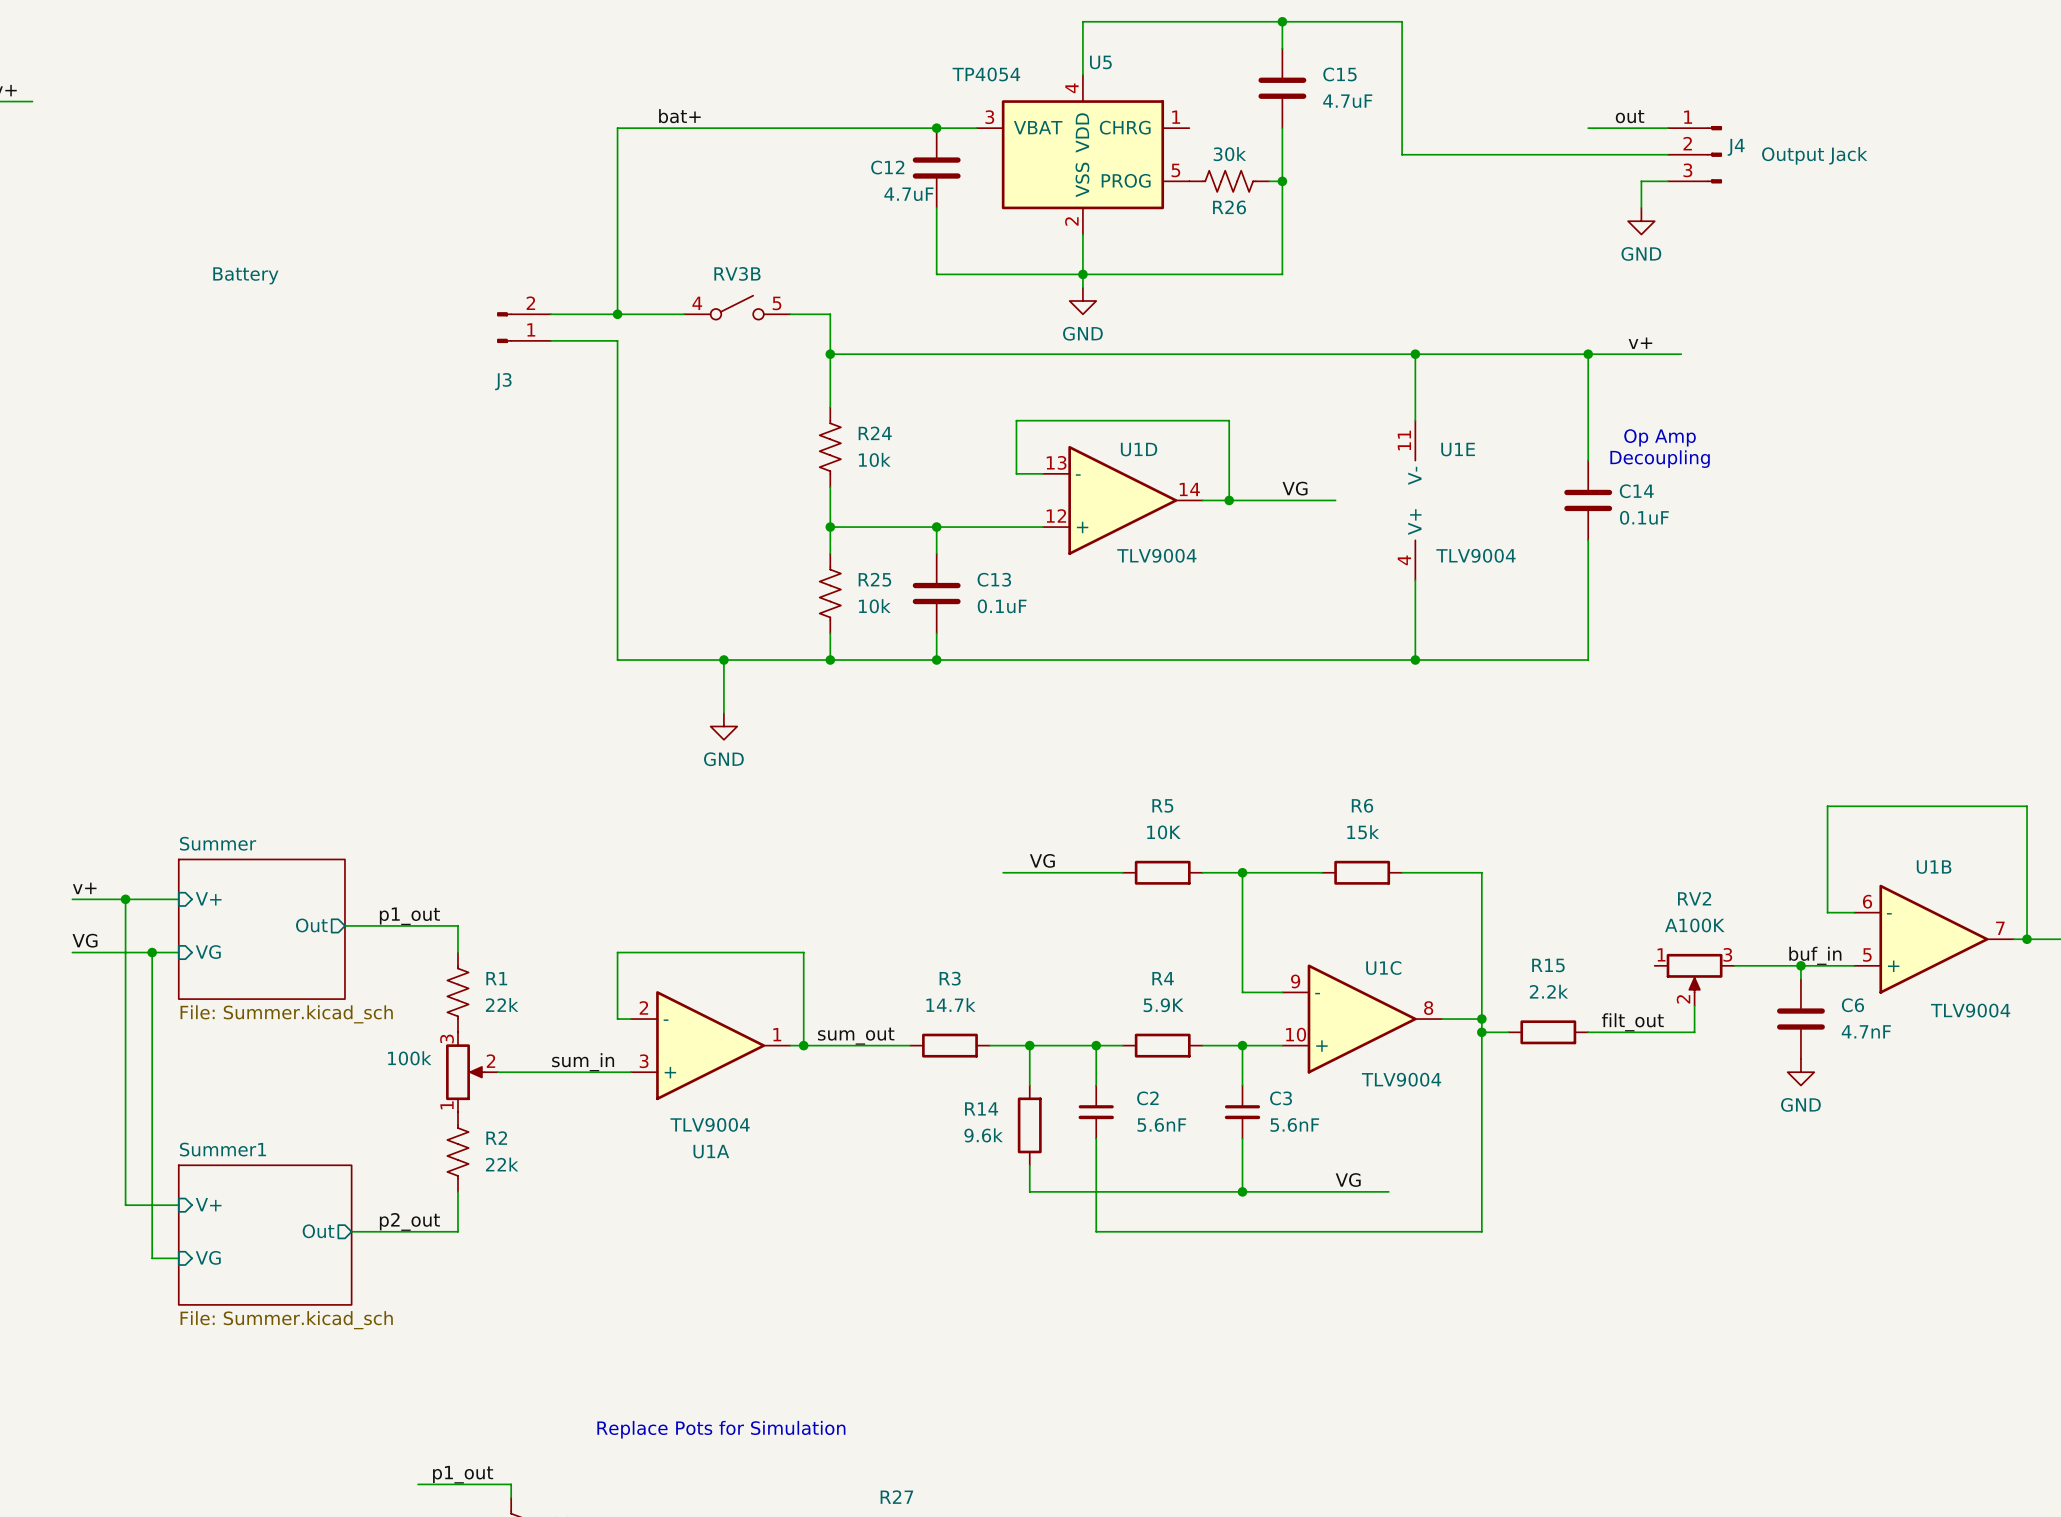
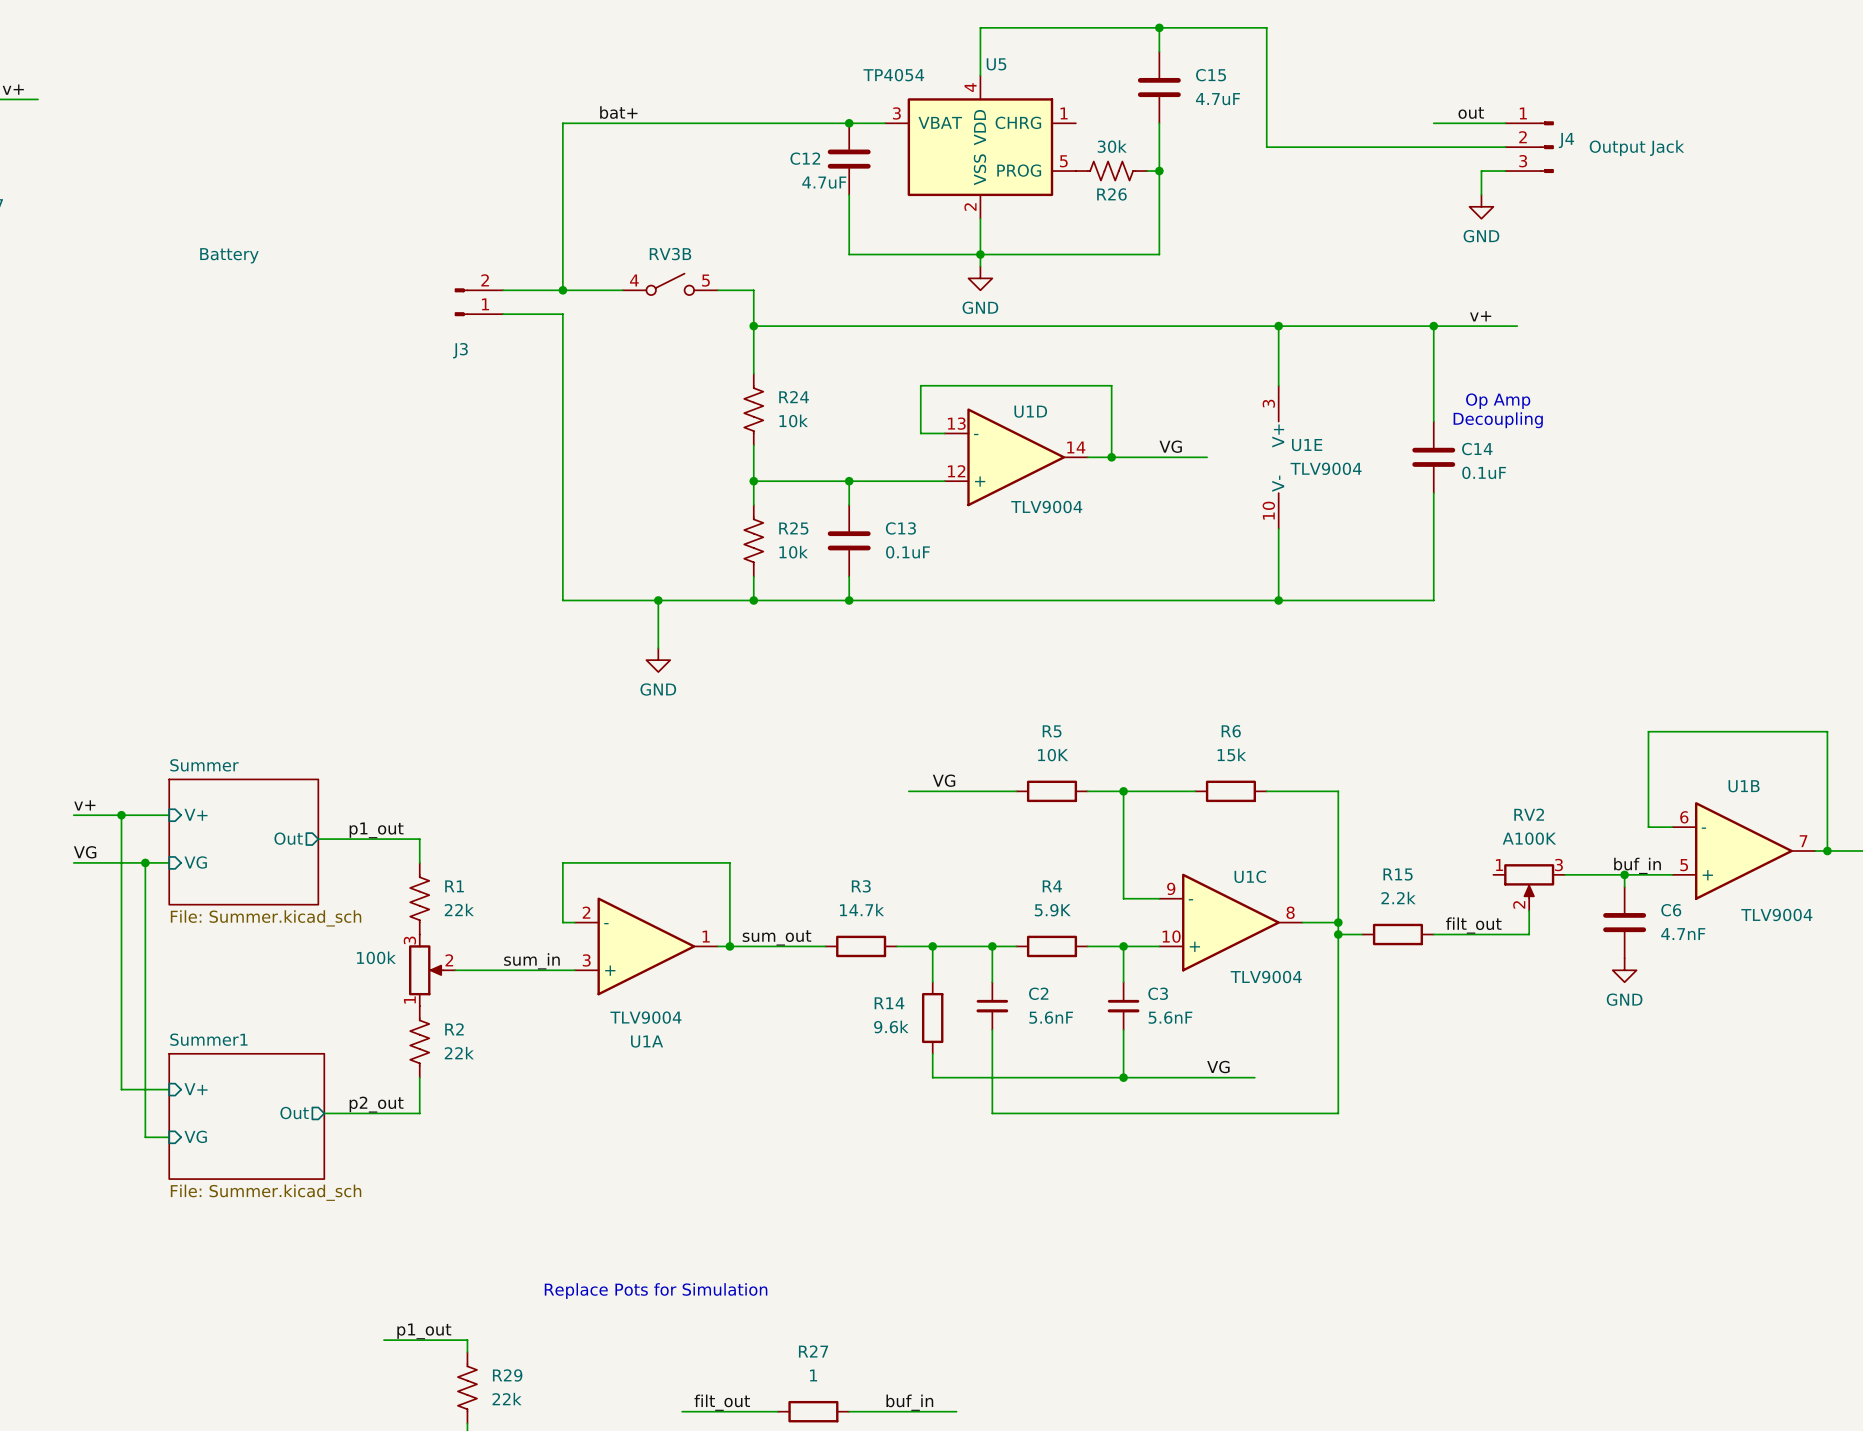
U1E pin number: 11 (1404, 440) -> 3 (1268, 403)
U1E name position: U1E (1458, 449) -> U1E (1307, 445)
U1E pin name: V- (1414, 475) -> V+ (1278, 435)
U1E pin name: V+ (1414, 522) -> V- (1278, 483)
U1E value position: TLV9004 (1475, 555) -> TLV9004 (1326, 468)
U1E pin number: 4 (1404, 560) -> 10 (1268, 510)

